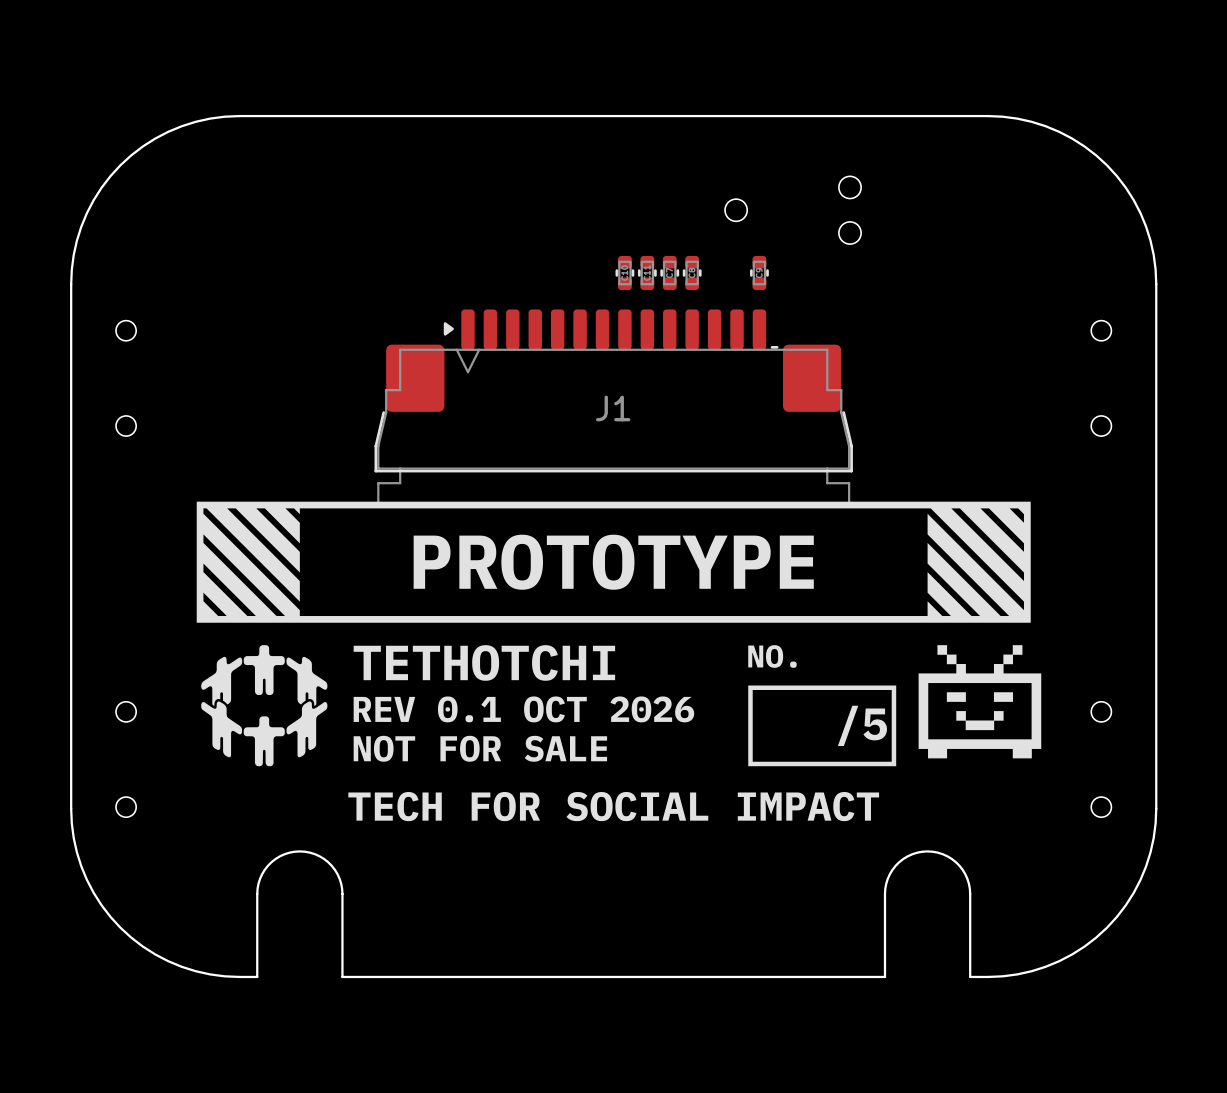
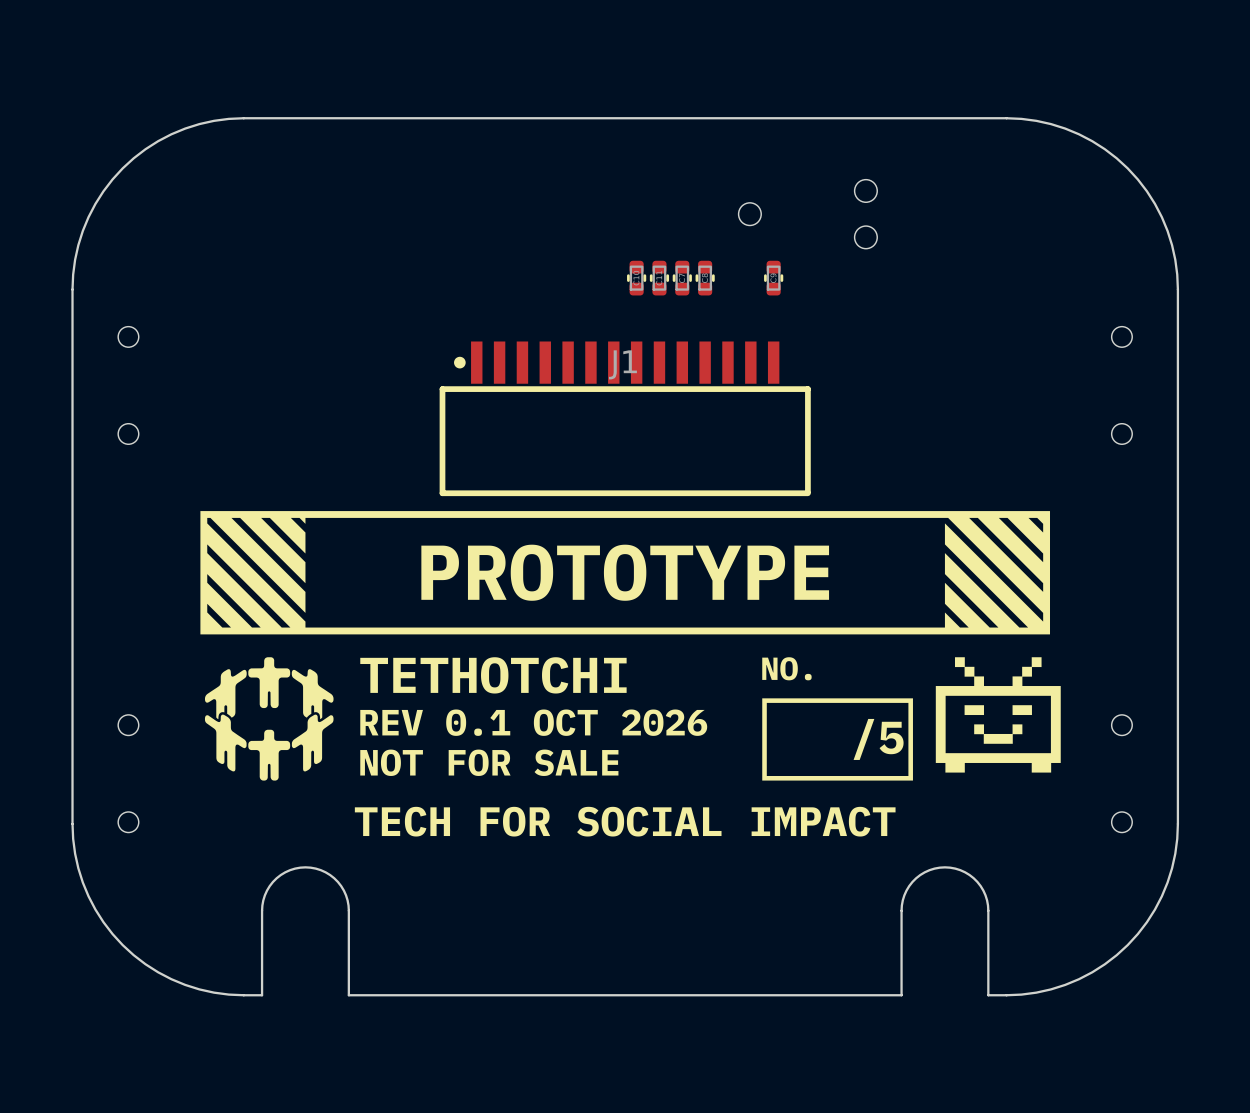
J1 footprint: [374, 309, 853, 507] -> [439, 341, 811, 497]
J1 name position: J1 (613, 408) -> J1 (622, 364)

